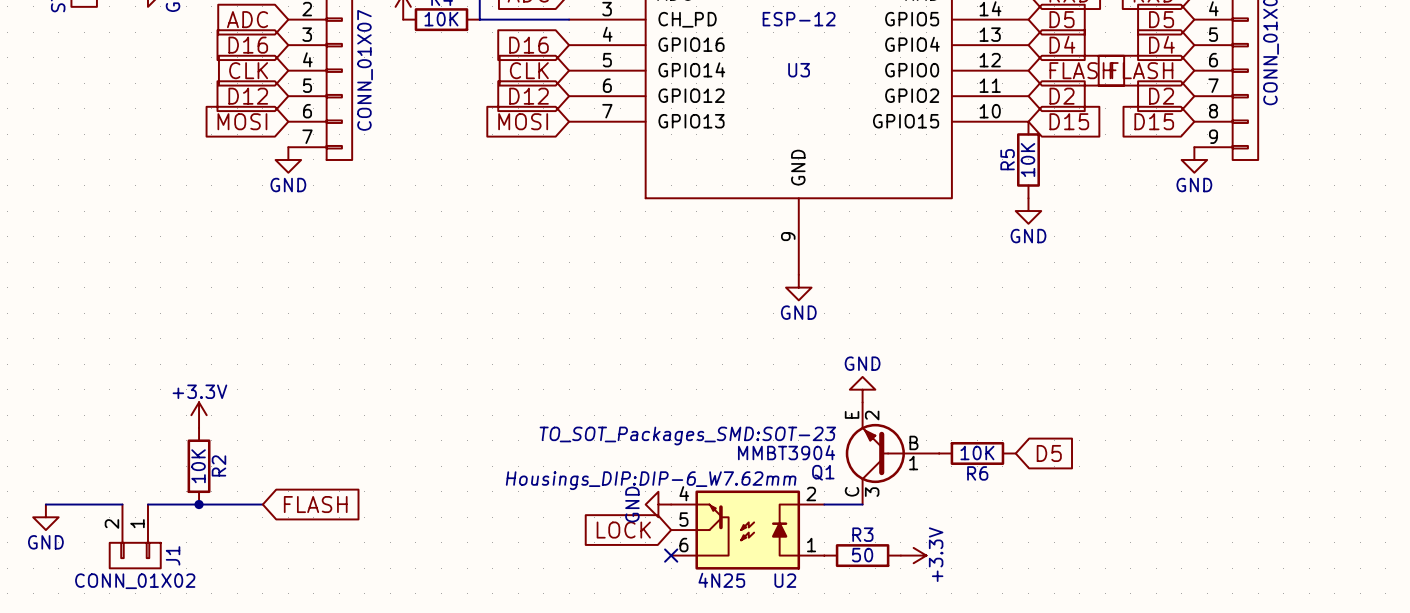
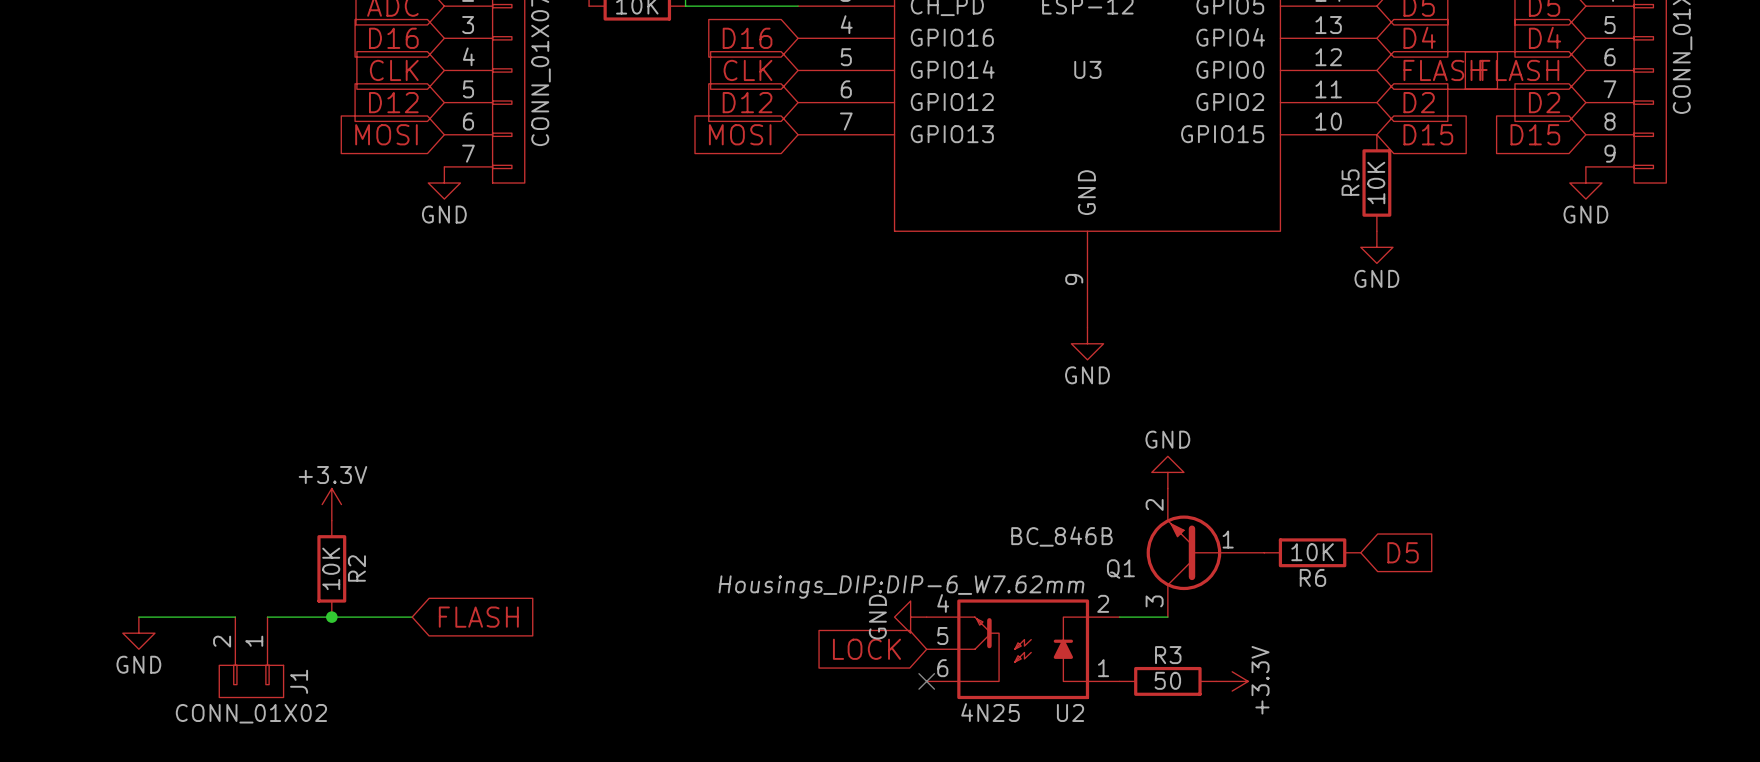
Q1 symbol: [845, 402, 940, 505] -> [1146, 488, 1265, 618]
Q1 text: TO_SOT_Packages_SMD:SOT-23 (687, 436) -> none
Q1 value: MMBT3904 (786, 452) -> BC_846B (1061, 536)

